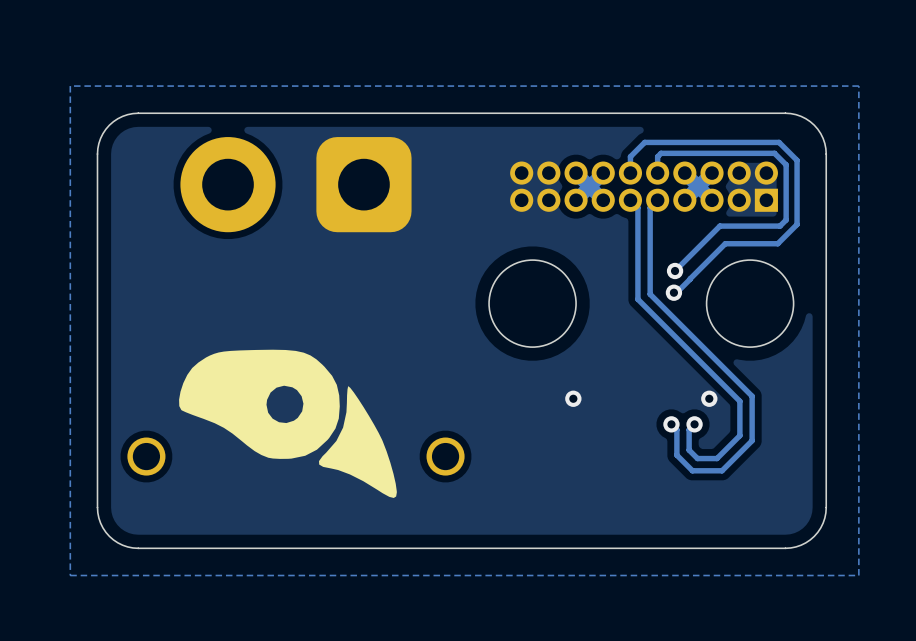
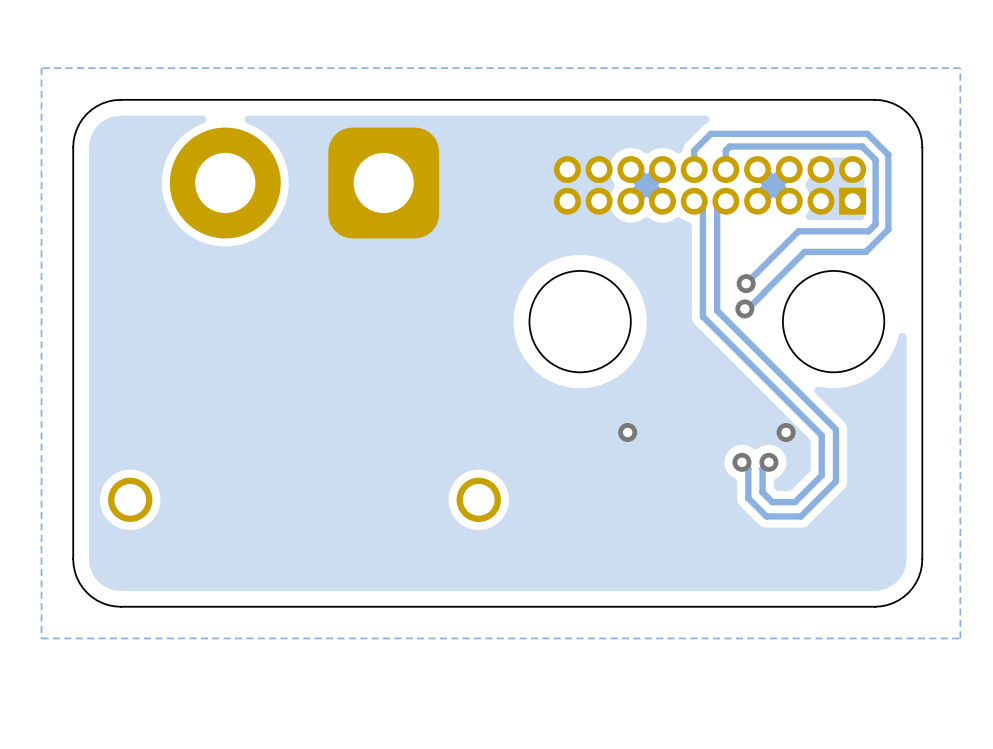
drawing: [179, 349, 397, 498] -> none

